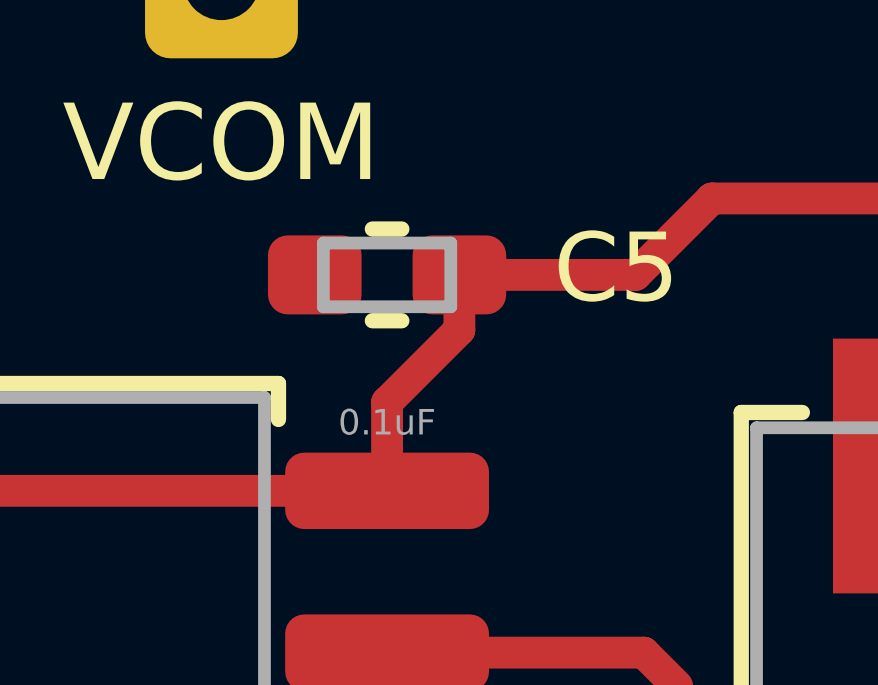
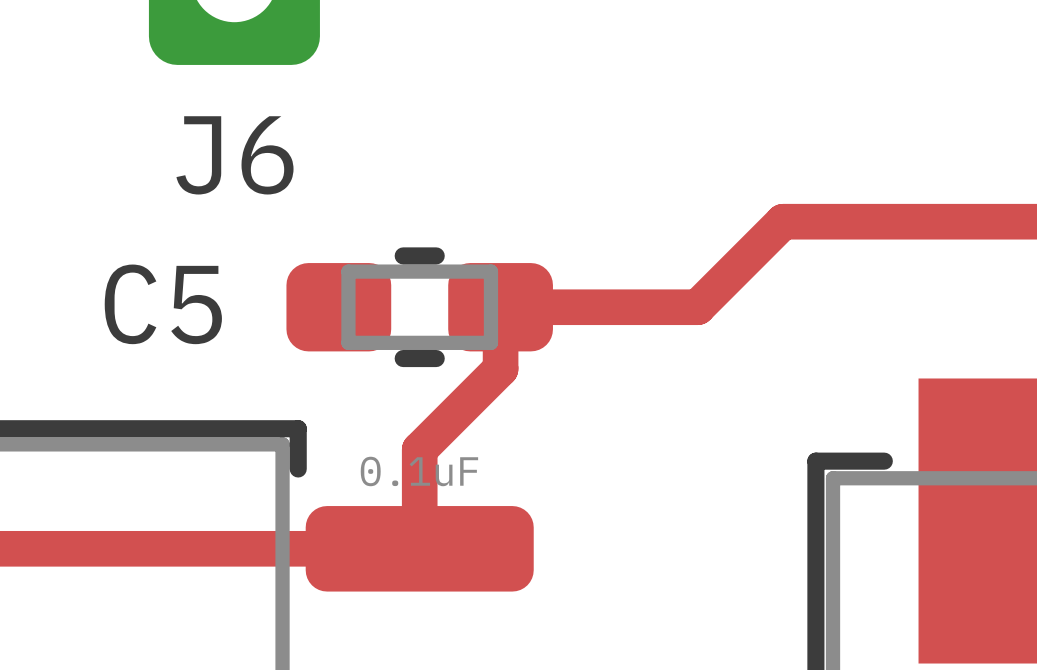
text: VCOM (216, 140) -> none
J6 name: none -> J6 (234, 155)
C5 name position: C5 (614, 266) -> C5 (163, 304)

